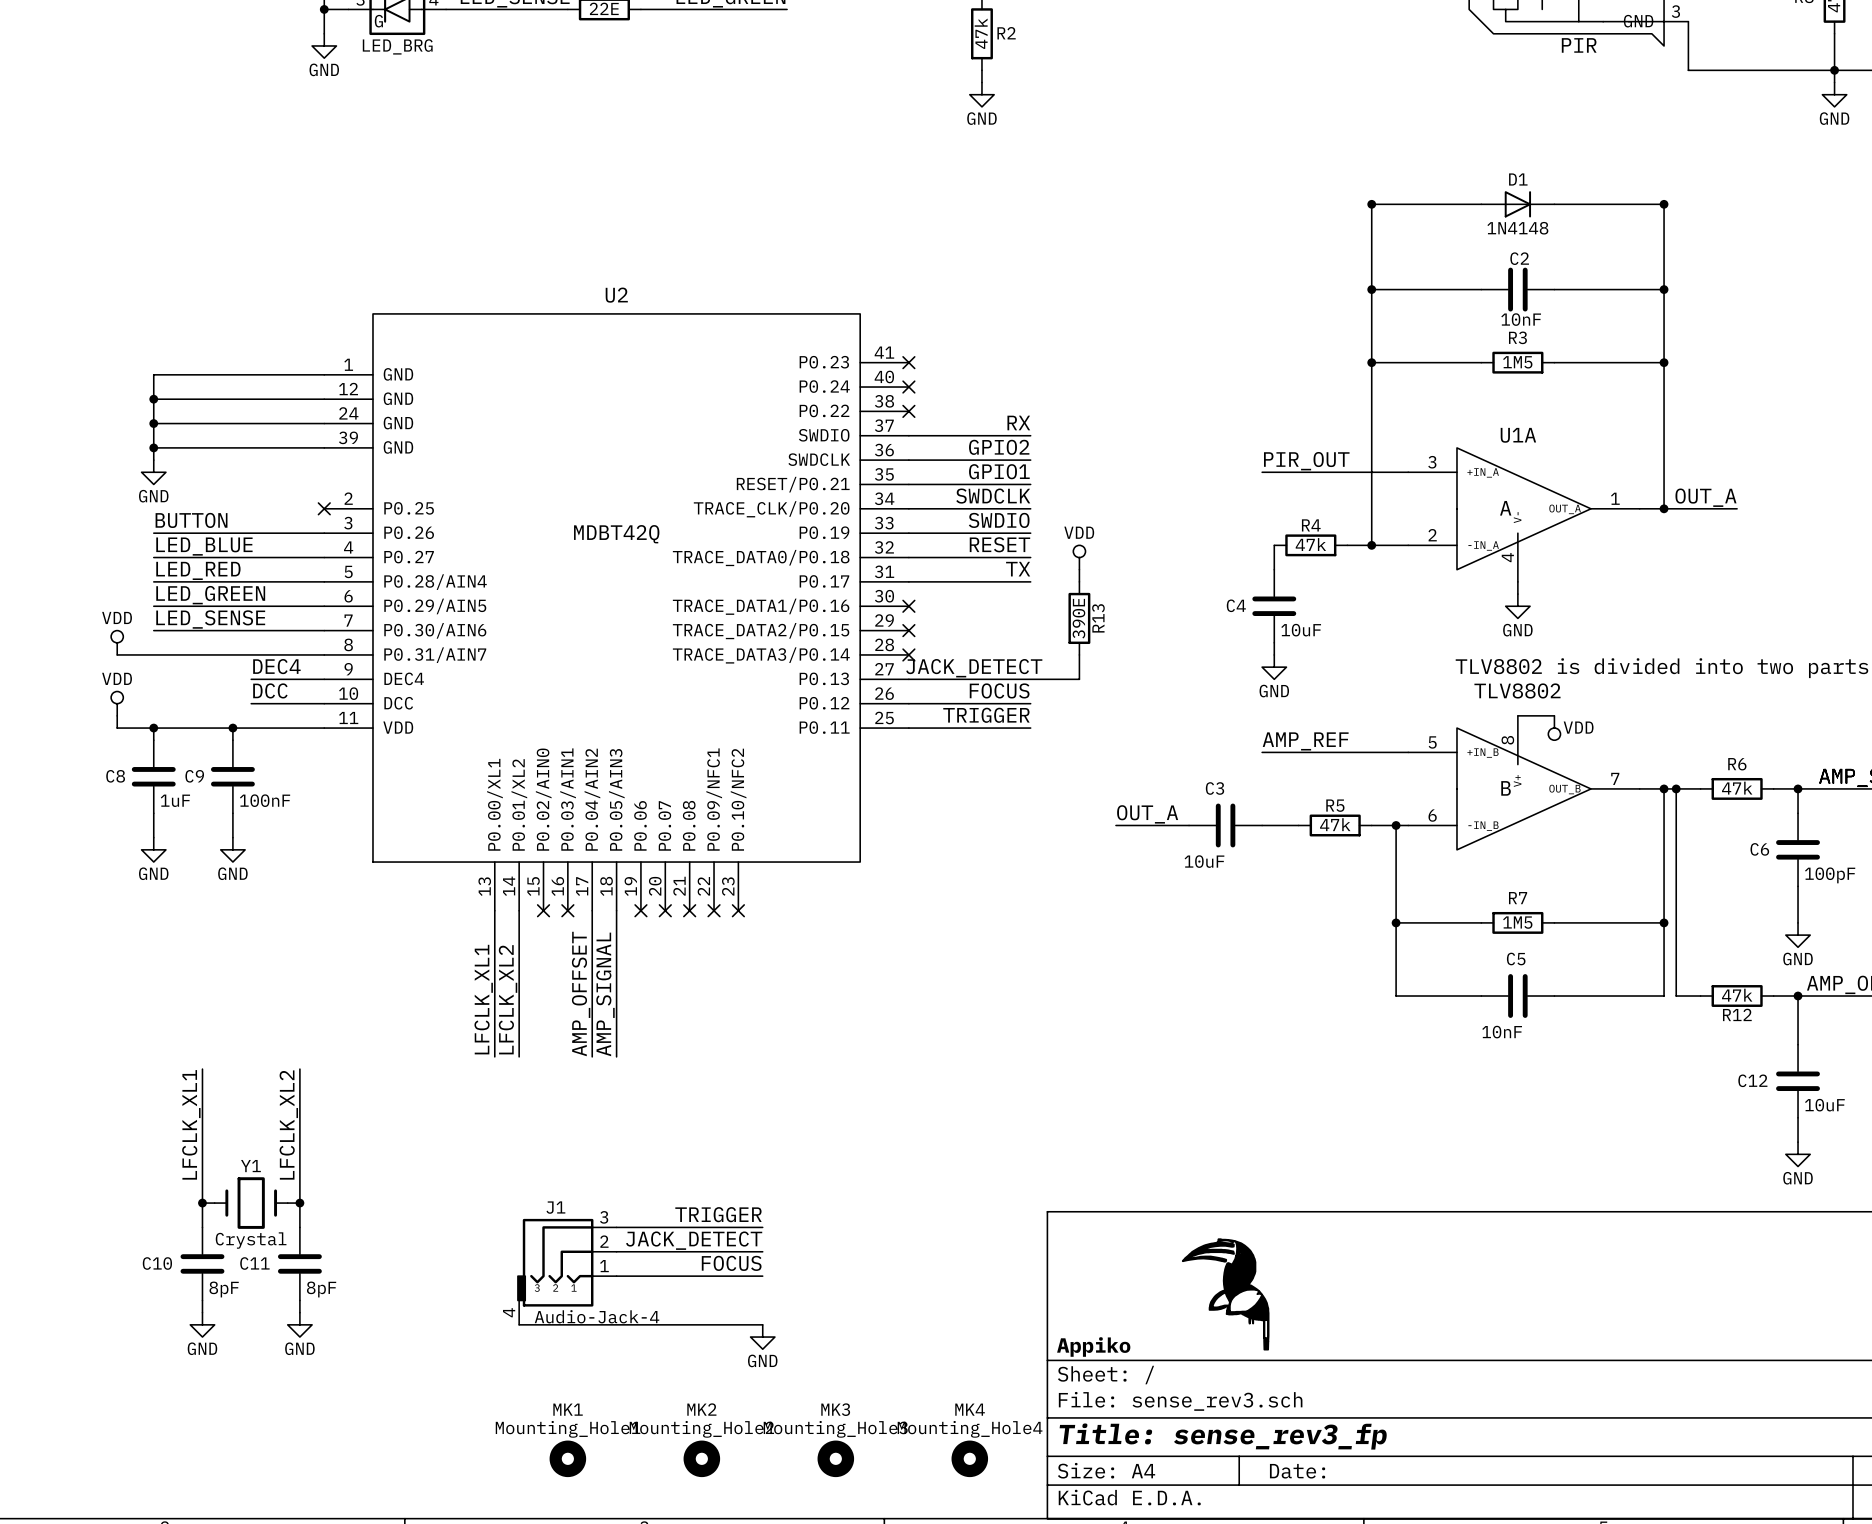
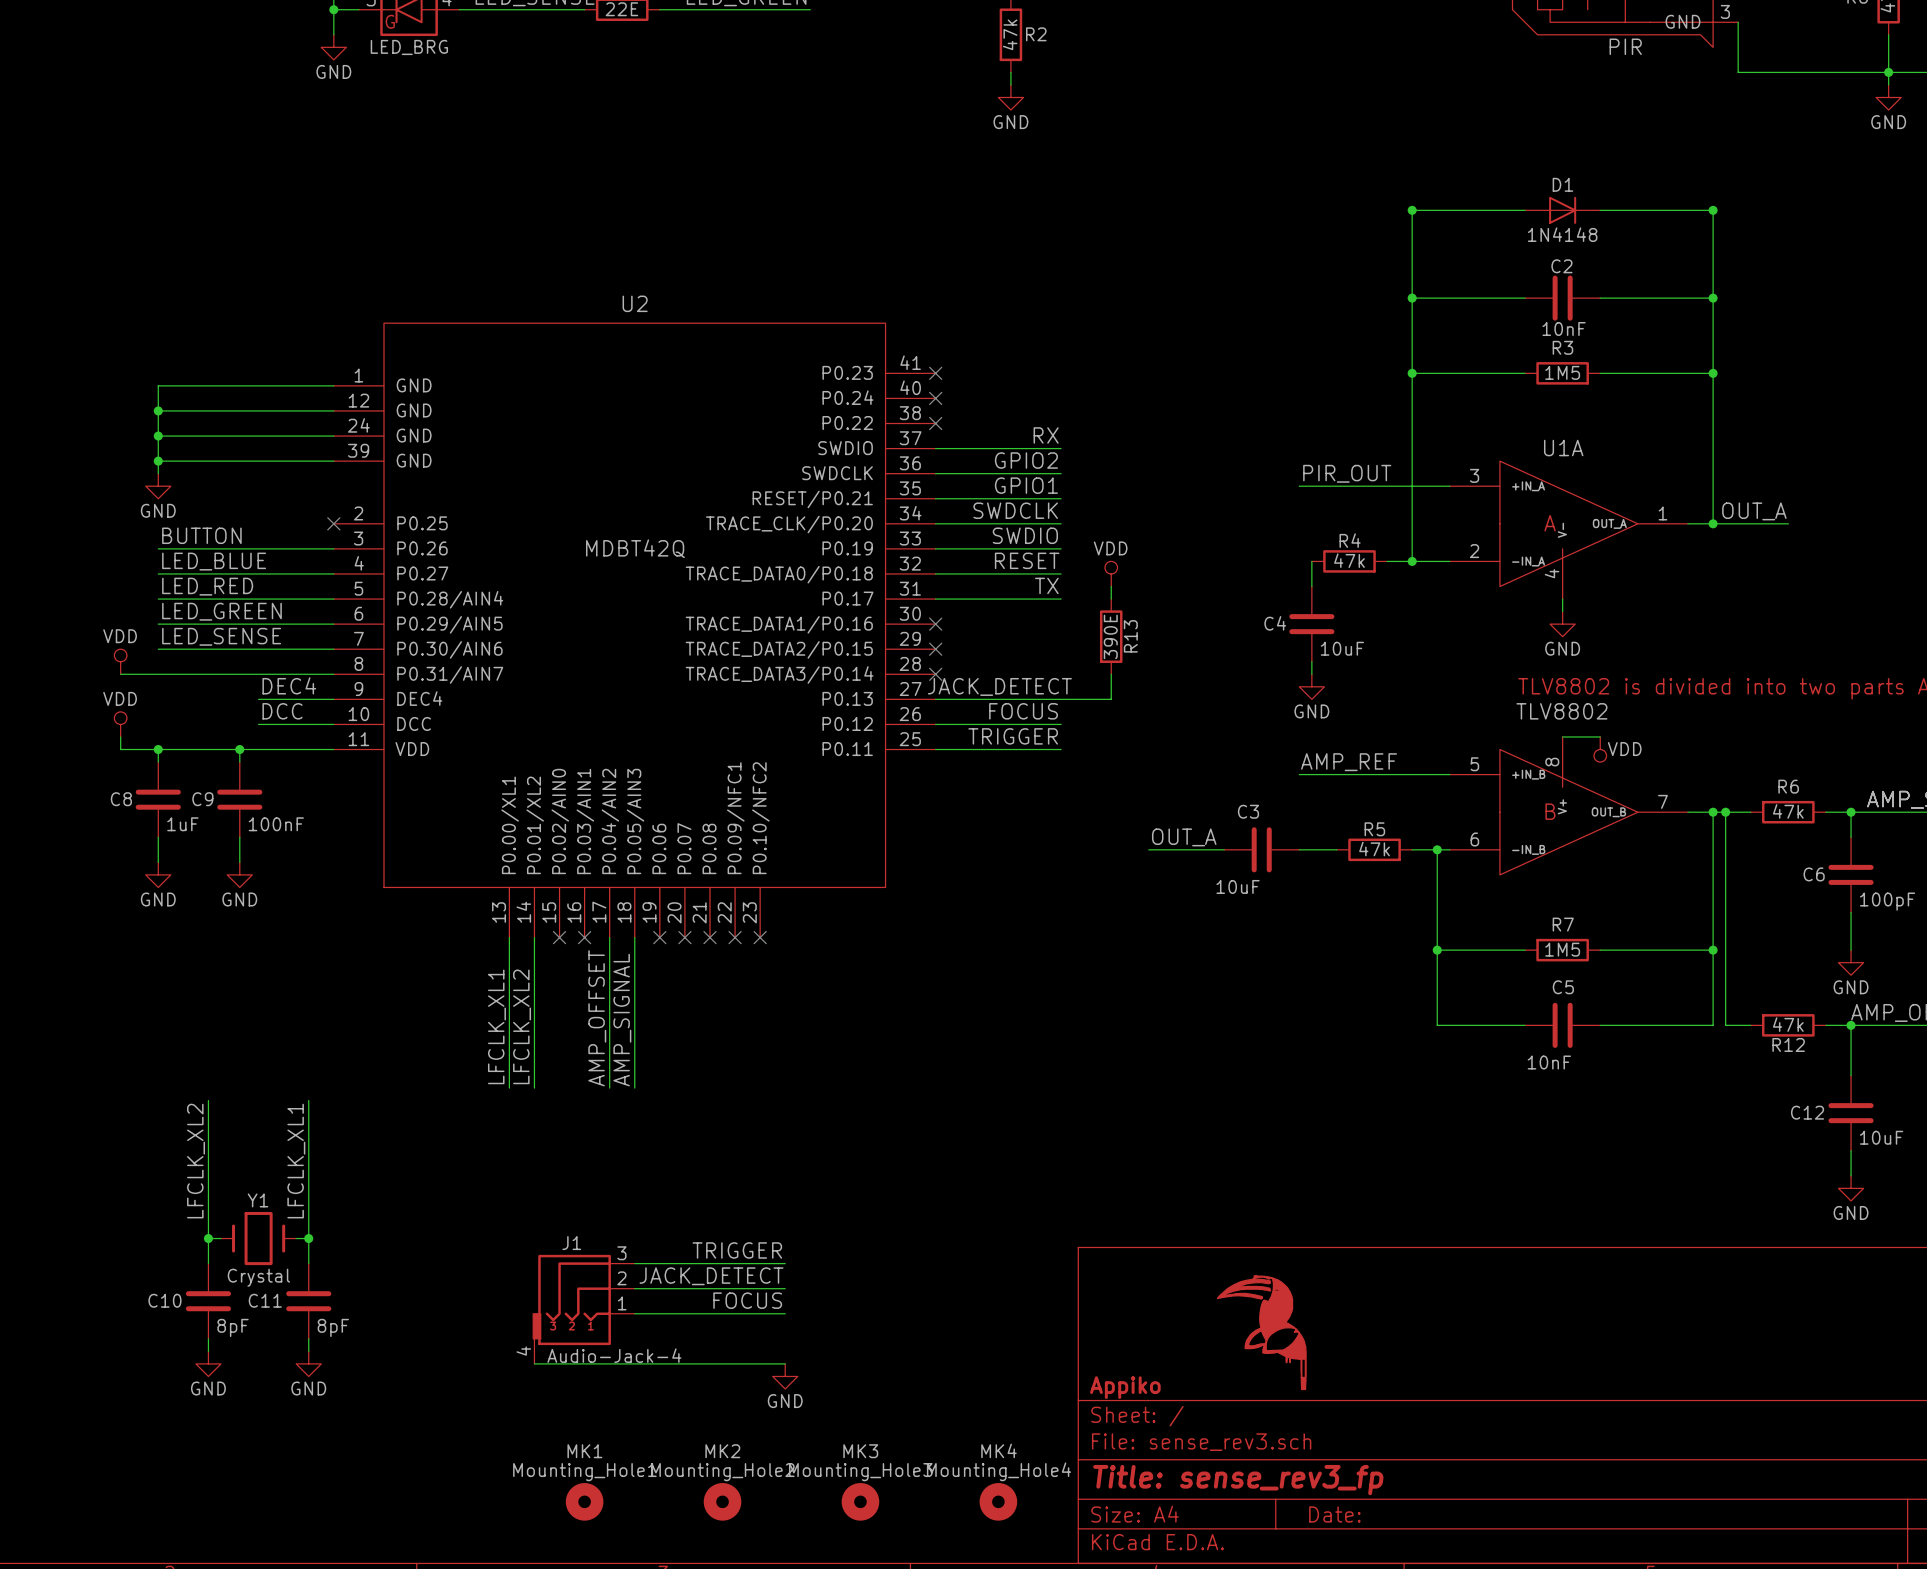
label: LFCLK_XL1 (191, 1124) -> LFCLK_XL2 (196, 1161)
label: LFCLK_XL2 (288, 1125) -> LFCLK_XL1 (296, 1161)

